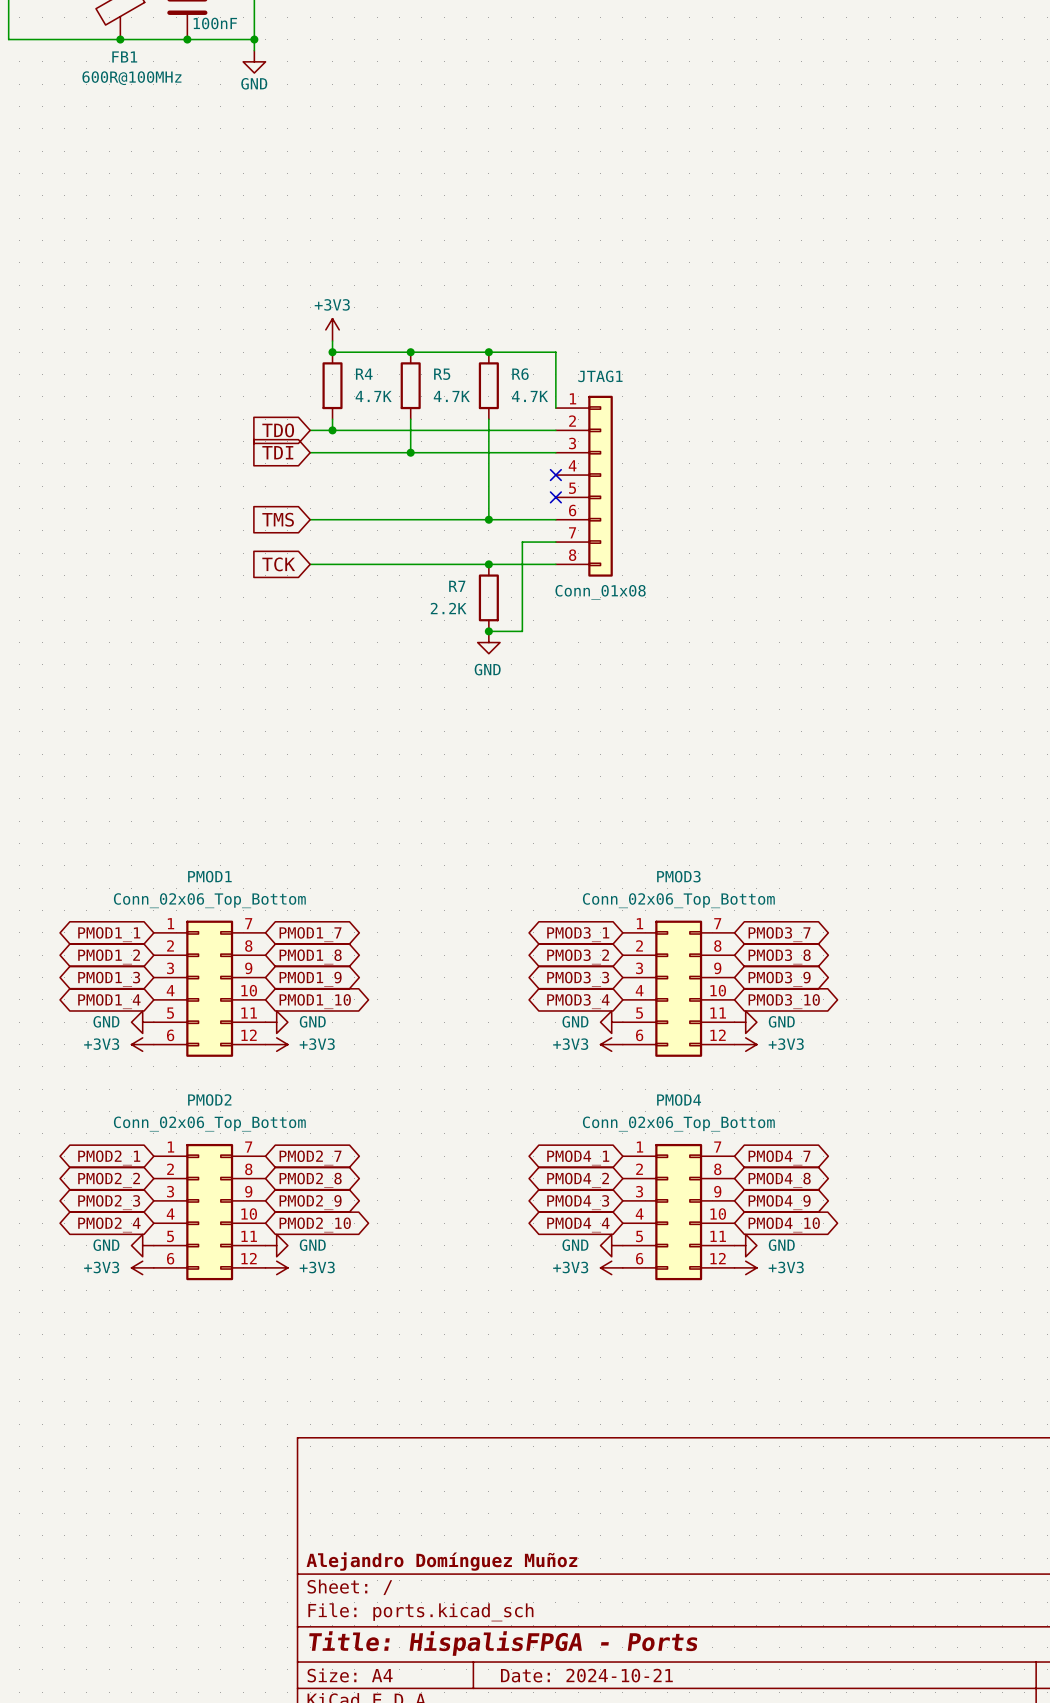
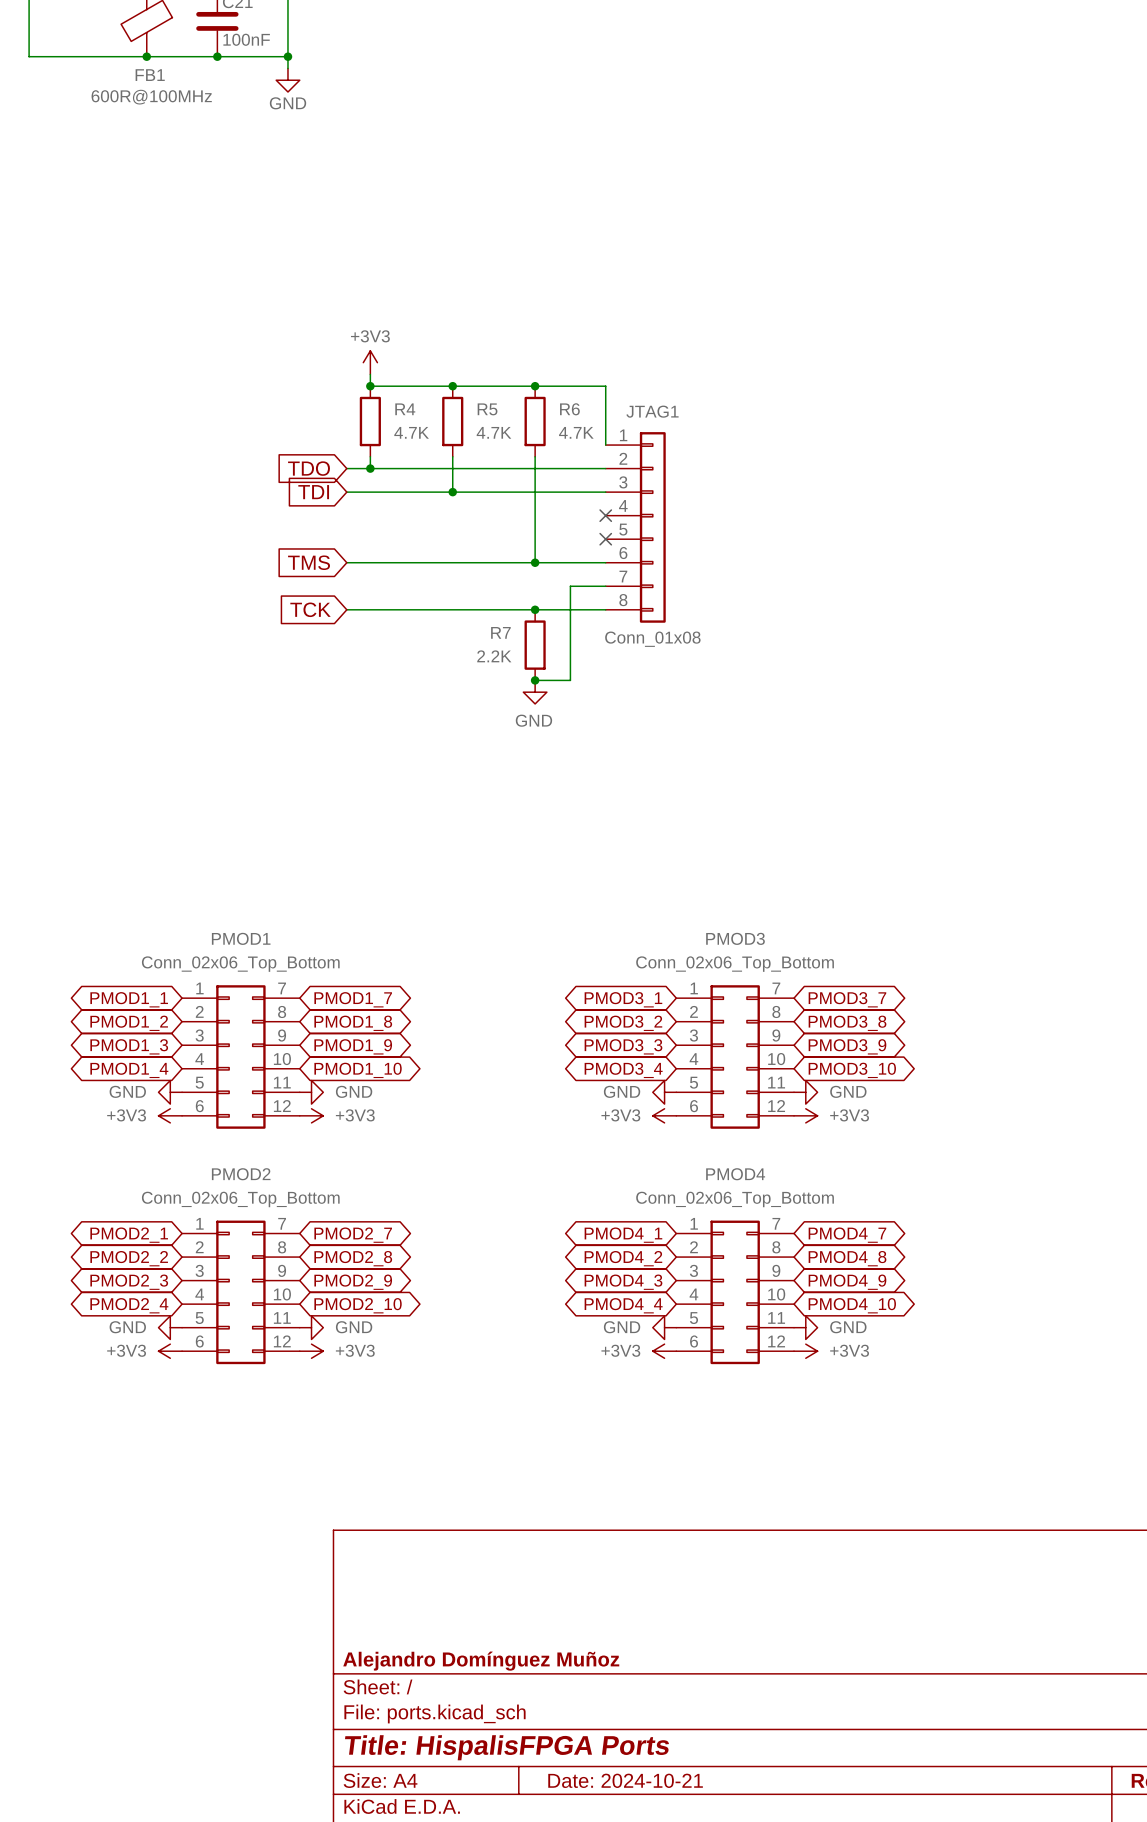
title block: Title: HispalisFPGA - Ports (503, 1643) -> Title: HispalisFPGA Ports (506, 1747)

